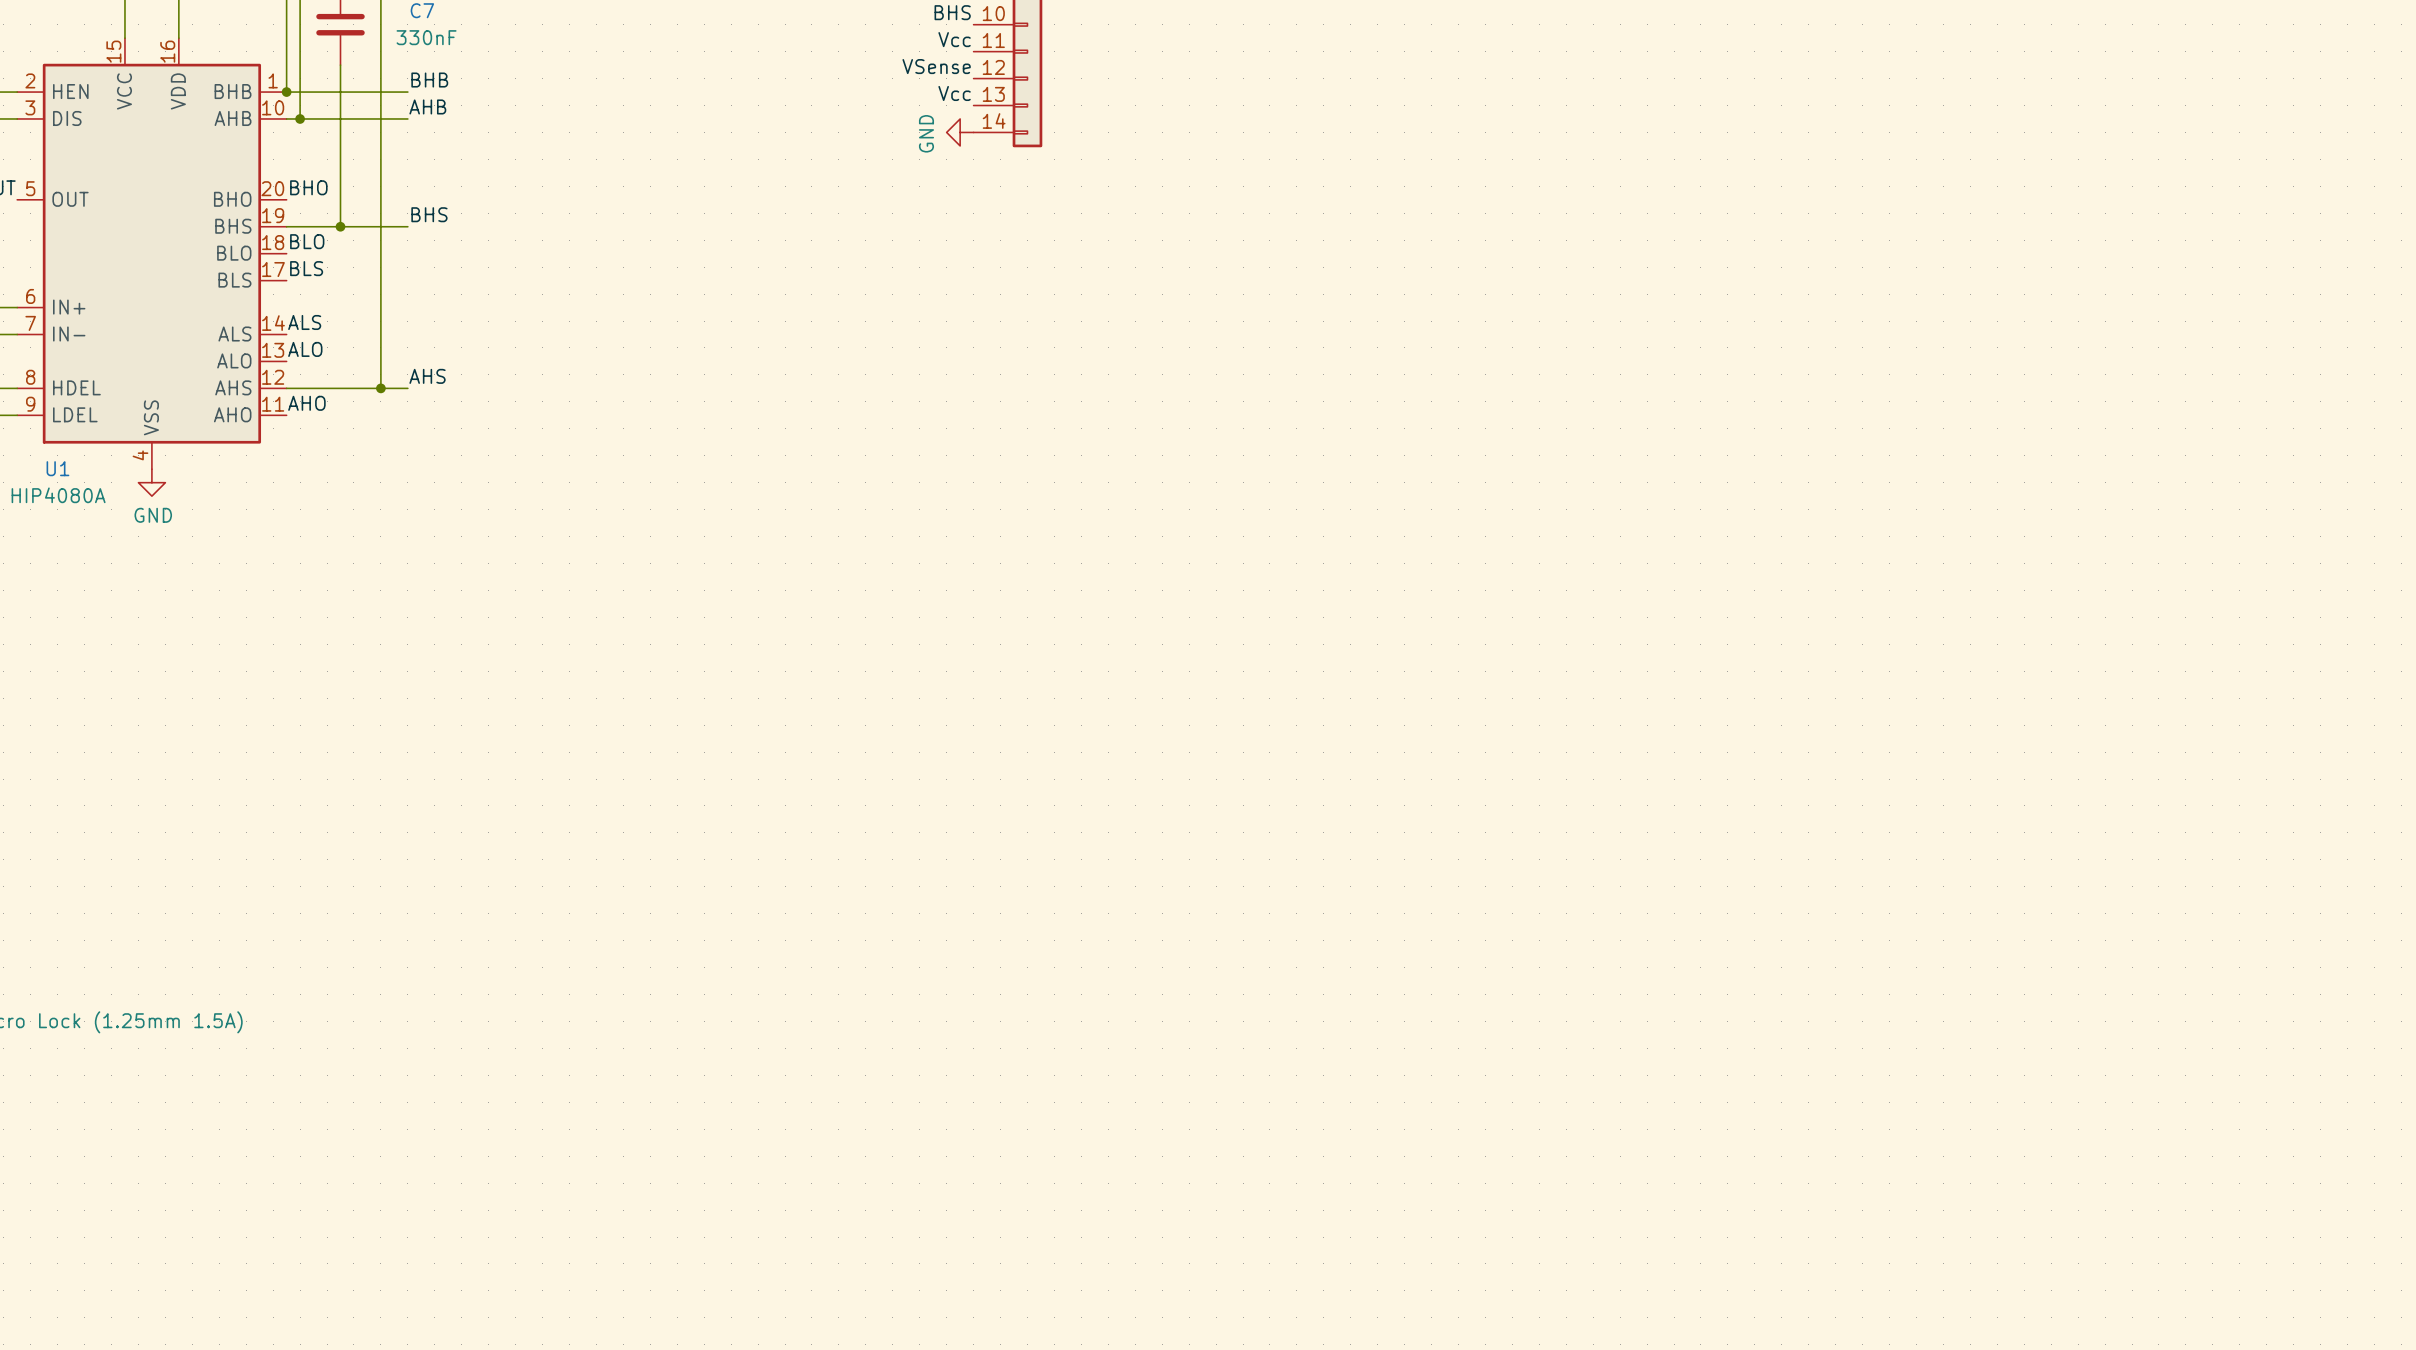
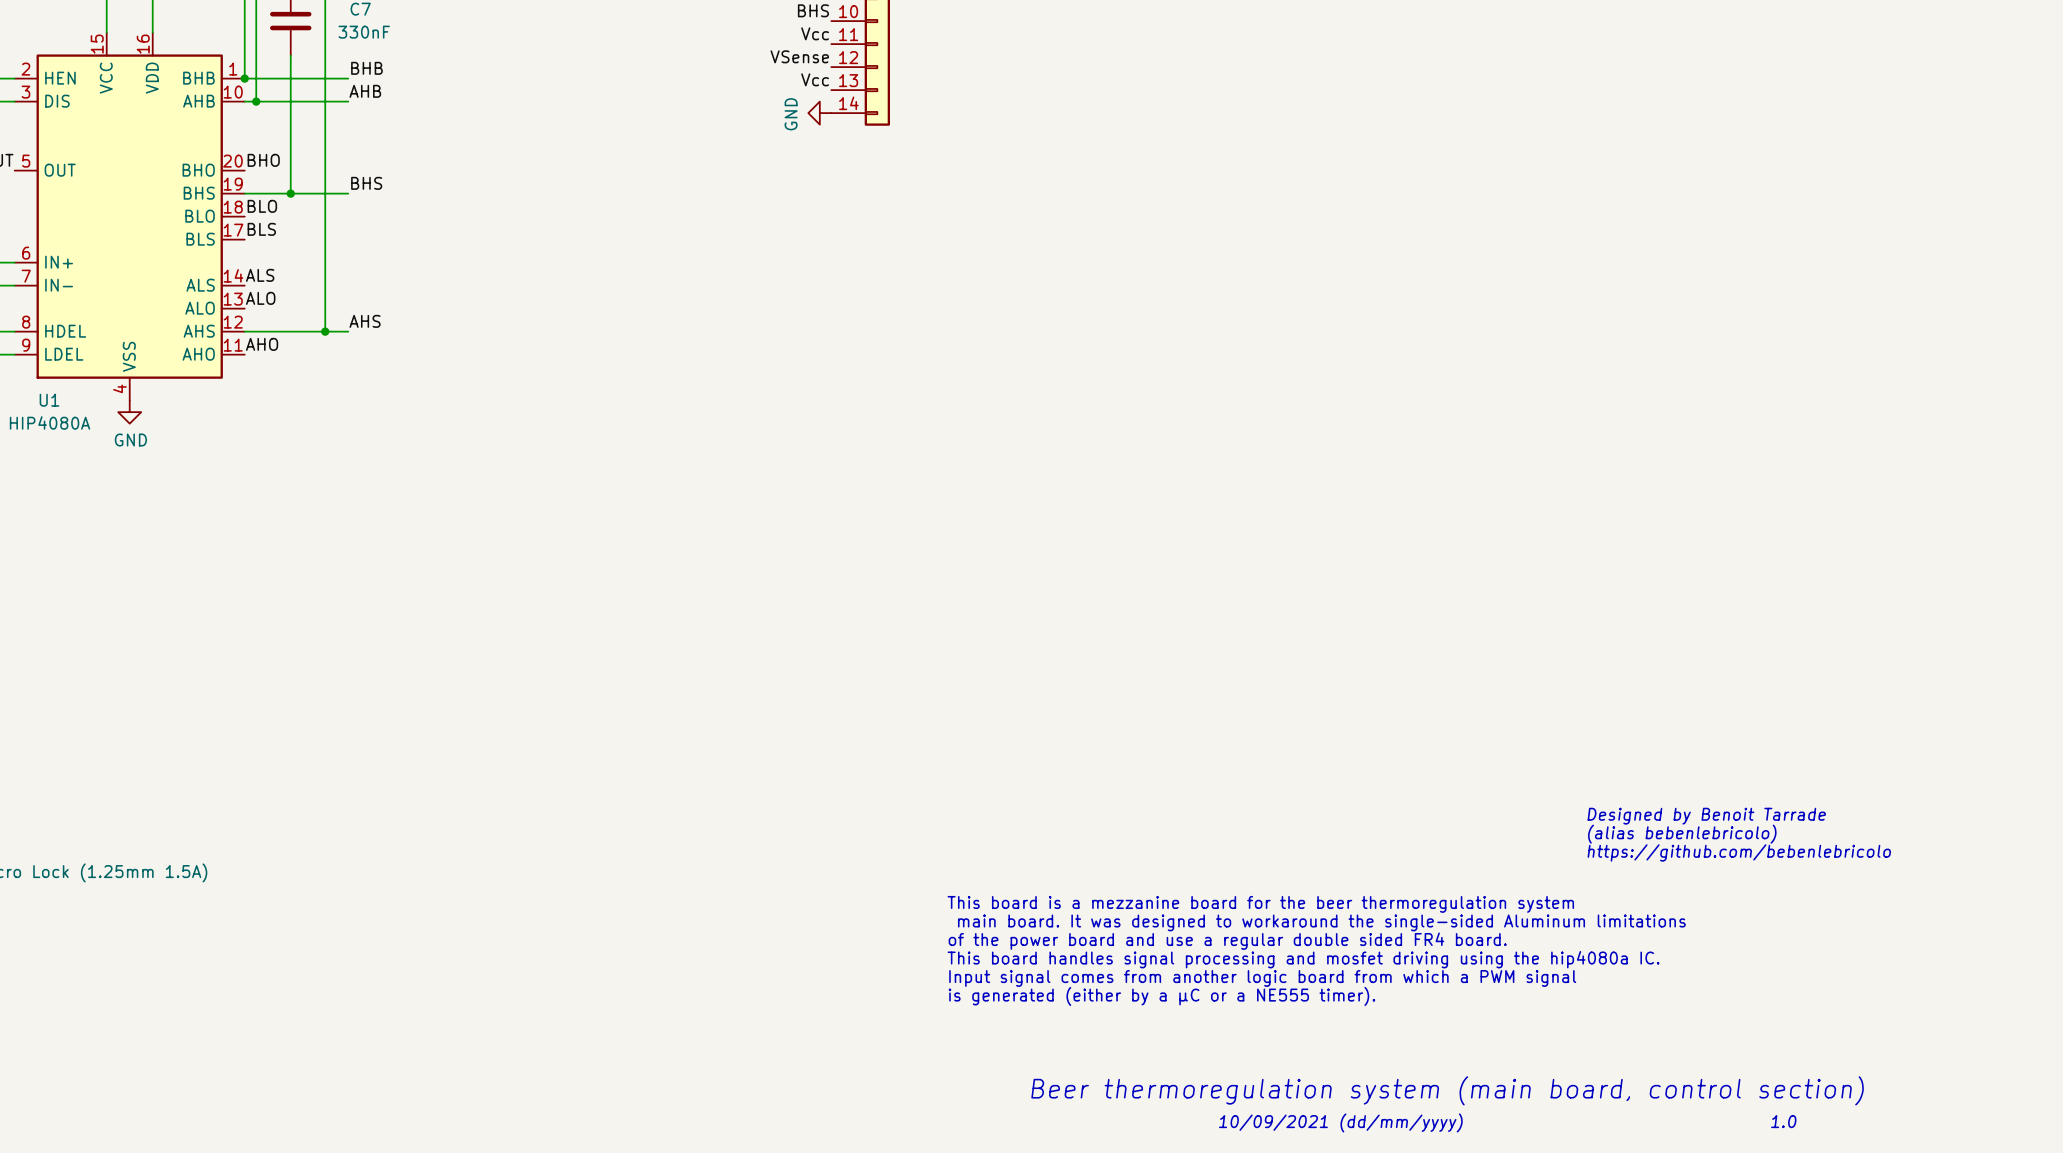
text: none -> Designed by Benoit Tarrade (1706, 816)
text: none -> (alias bebenlebricolo) (1682, 834)
text: none -> https://github.com/bebenlebricolo (1739, 852)
text: none -> This board is a mezzanine board for the beer thermoregulation system (1260, 904)
text: none -> main board. It was designed to workaround the single-sided Aluminum limitations (1321, 922)
text: none -> of the power board and use a regular double sided FR4 board. (1227, 941)
text: none -> This board handles signal processing and mosfet driving using the hip4080a IC. (1303, 959)
text: none -> Input signal comes from another logic board from which a PWM signal (1262, 978)
text: none -> is generated (either by a µC or a NE555 timer). (1161, 996)
text: none -> Beer thermoregulation system (main board, control section) (1447, 1090)
text: none -> 1.0 (1783, 1121)
text: none -> 10/09/2021 (dd/mm/yyyy) (1340, 1122)

